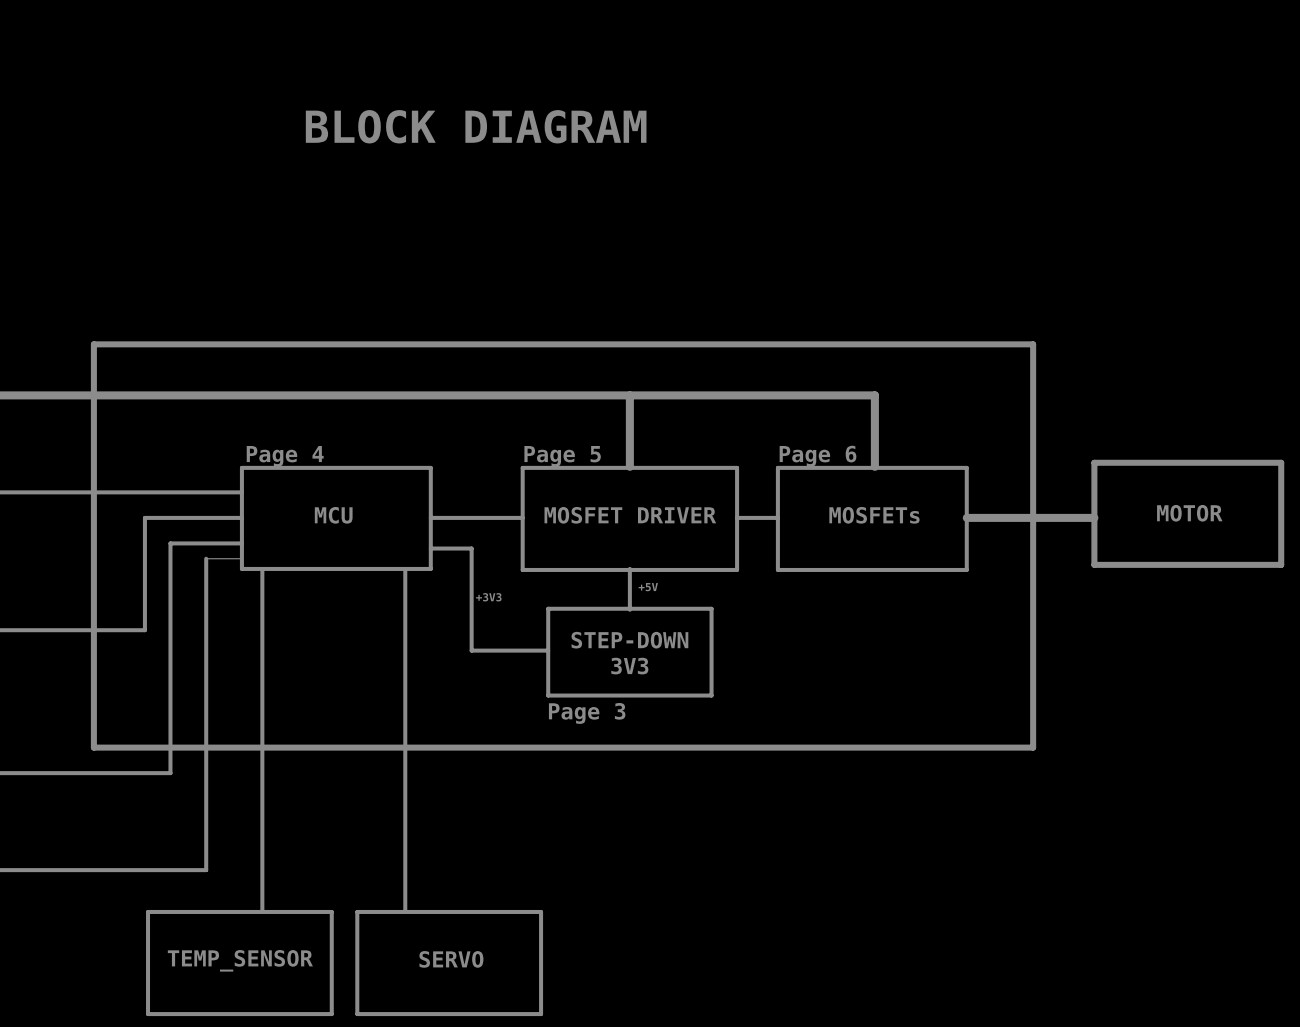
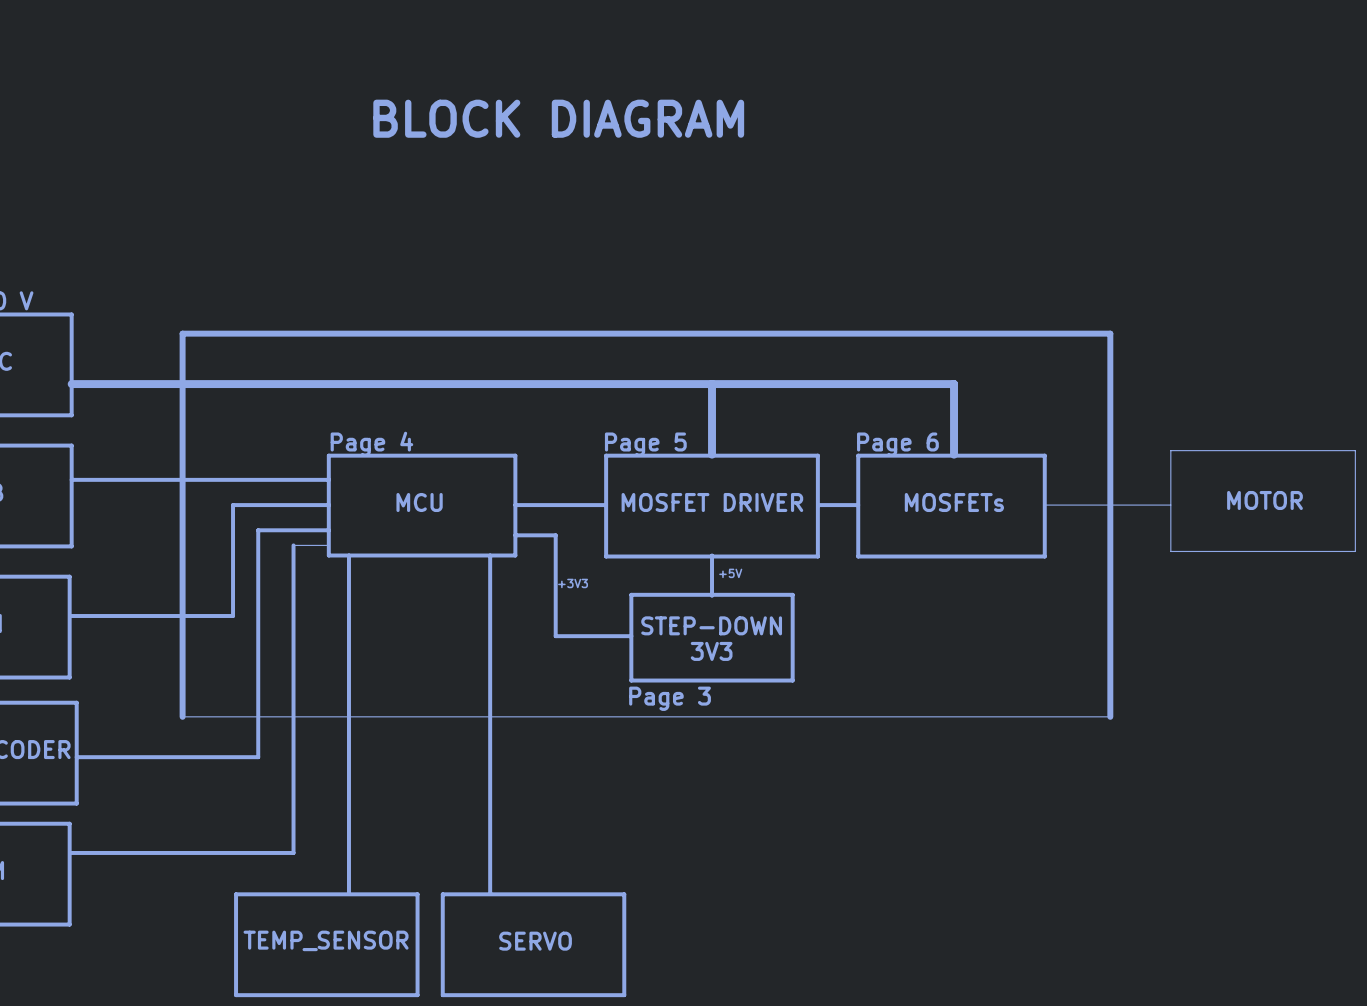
line width: thick (1094, 462) (1281, 462) (1281, 564) (1094, 564) (1094, 462) -> thin (1170, 450) (1355, 450) (1355, 551) (1170, 551) (1170, 450)
line width: thick (966, 517) (1094, 517) -> thin (1044, 505) (1170, 505)
line: (93, 732) (93, 747) (1033, 747) (1033, 732) -> (182, 716) (1110, 716)

